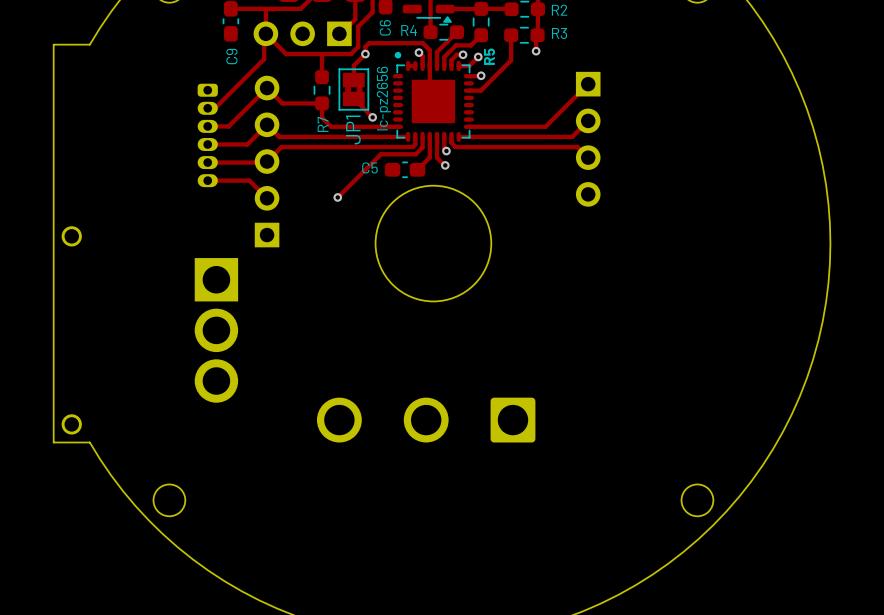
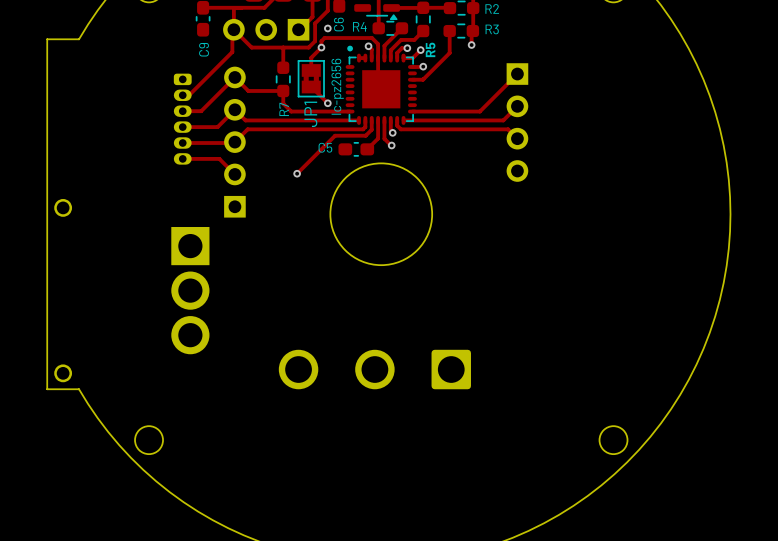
via: none -> (327, 28)

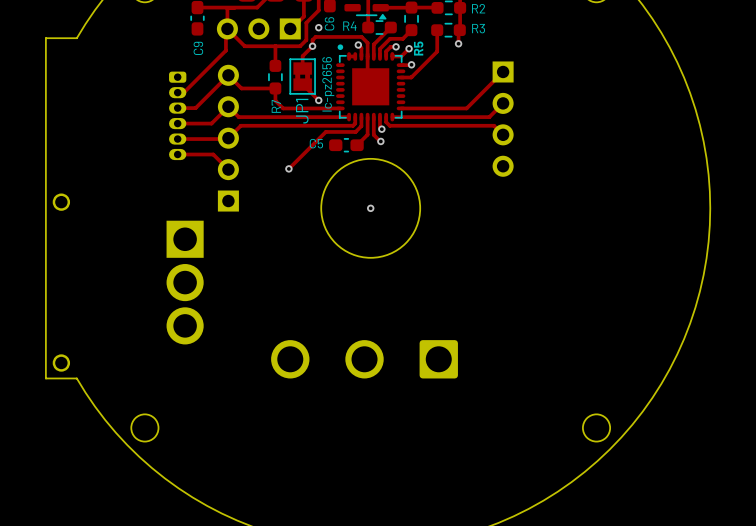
via: none -> (370, 208)

